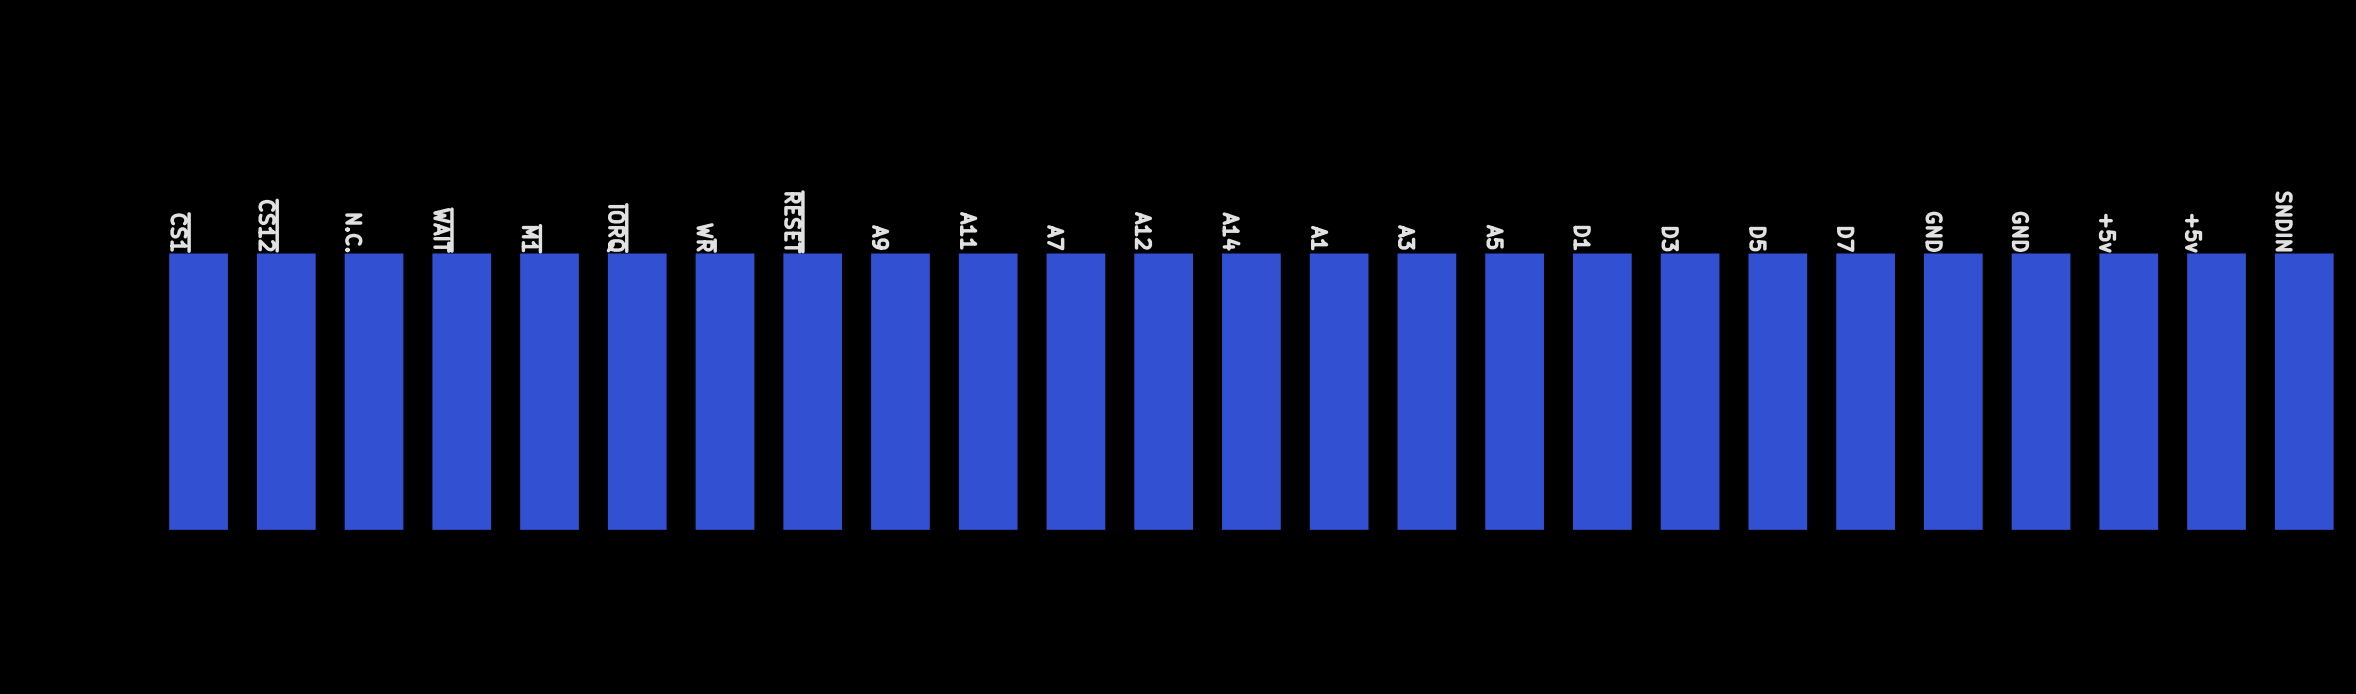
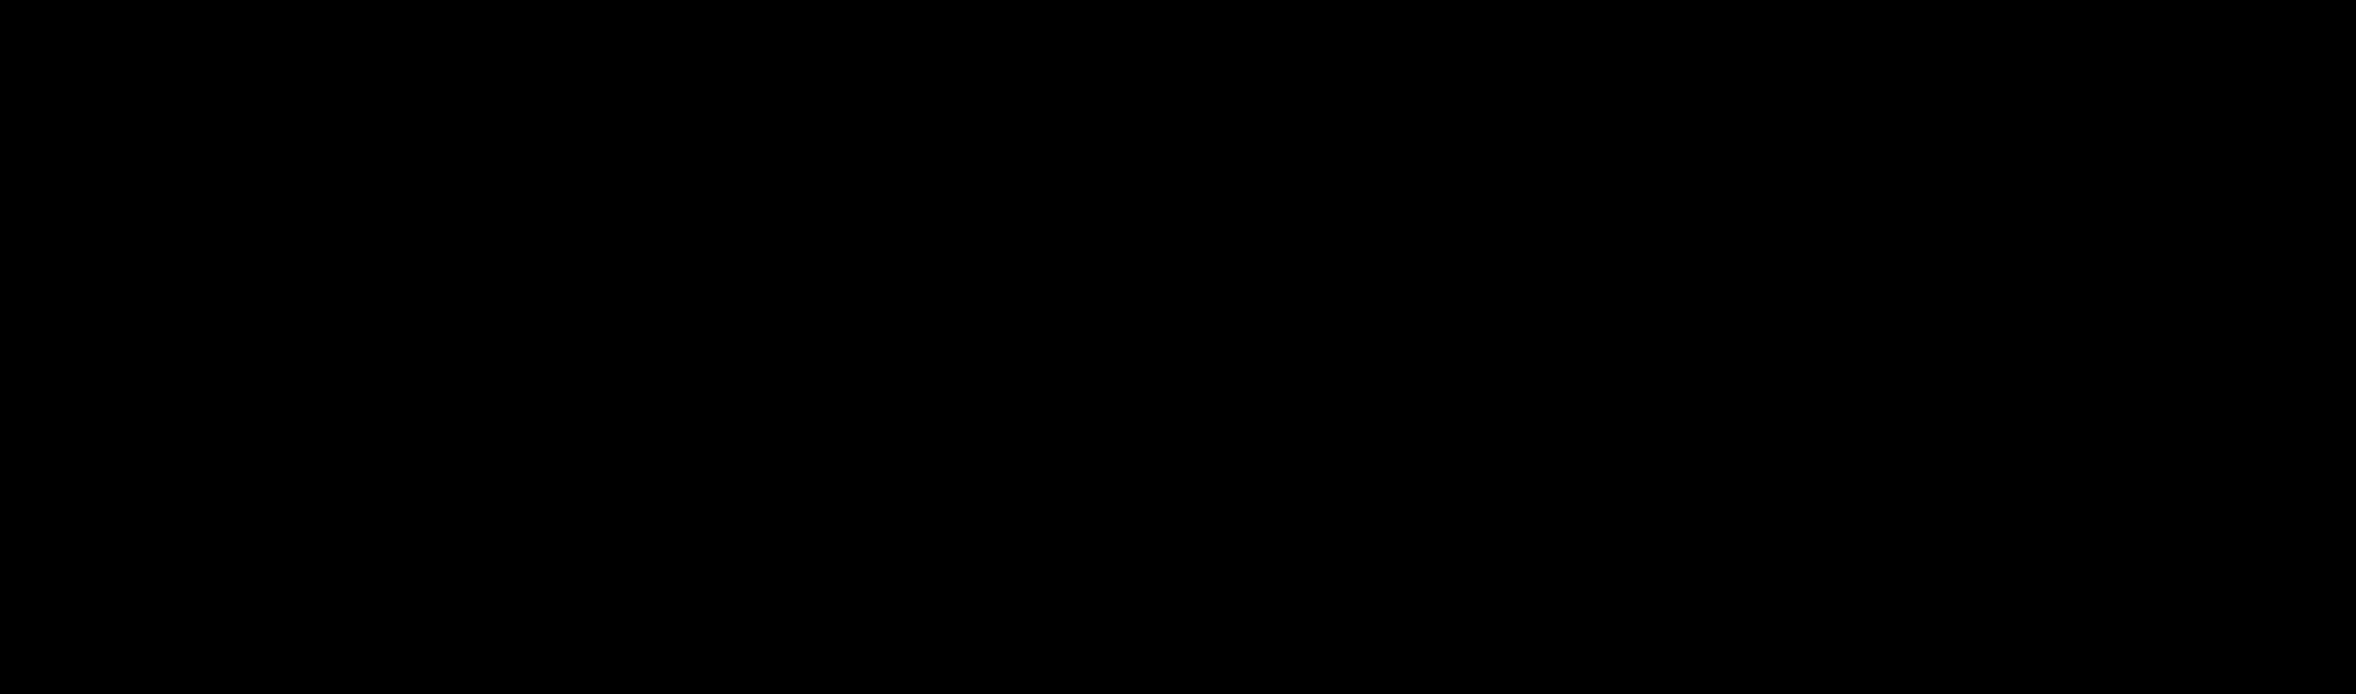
part: (1251, 391) -> none

